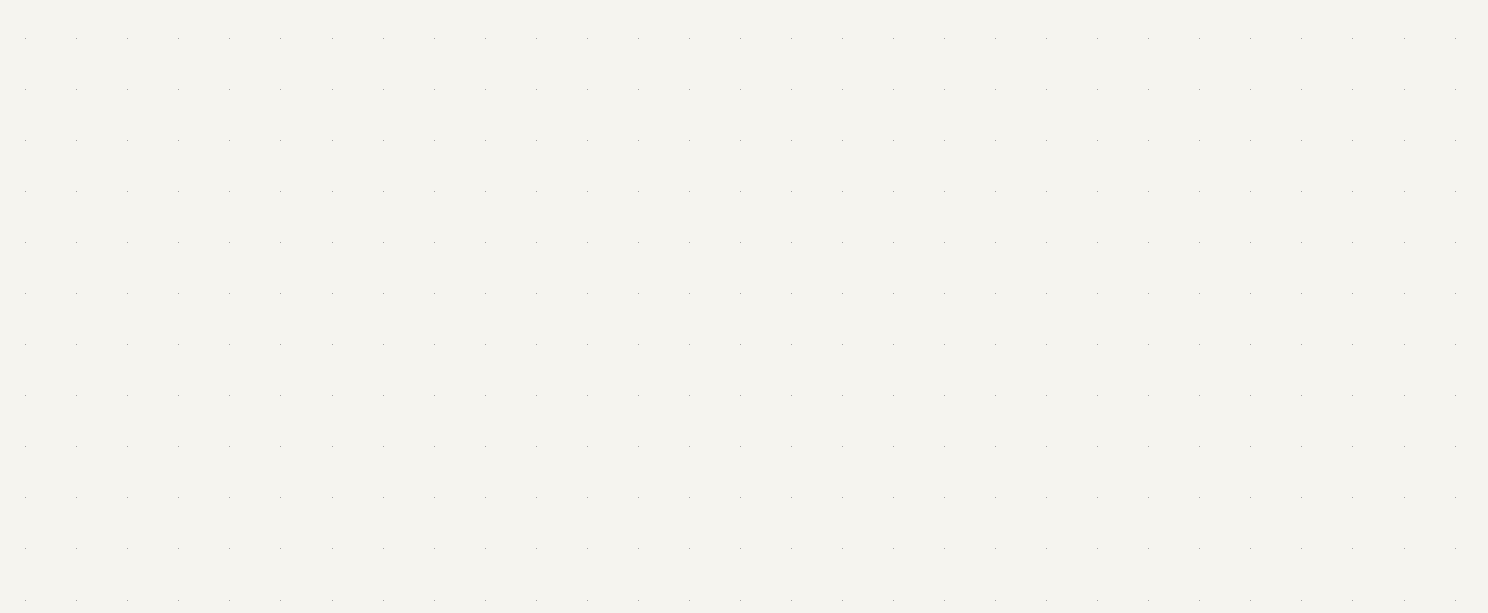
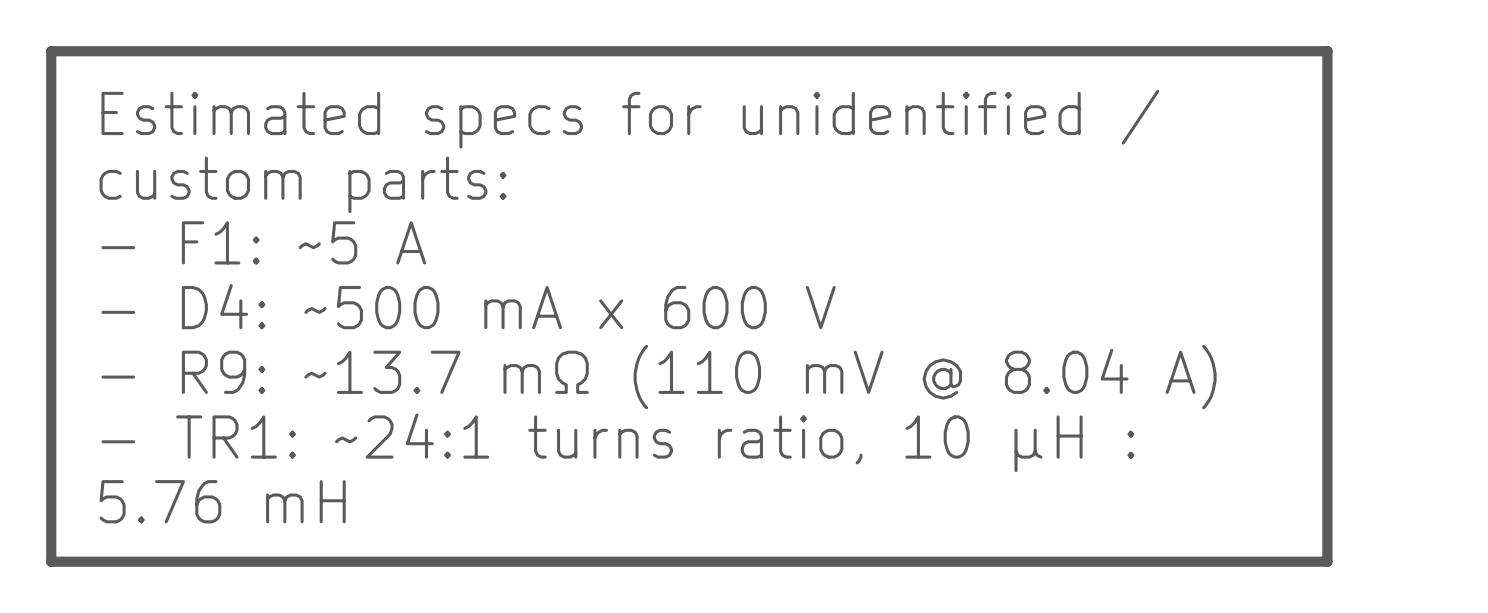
line: none -> (51, 51) (1327, 51) (1327, 561) (51, 561) (51, 51)
text: none -> Estimated specs for unidentified / (630, 119)
text: none -> custom parts: (303, 184)
text: none -> - F1: ~5 A (263, 242)
text: none -> - D4: ~500 mA x 600 V (468, 306)
text: none -> - R9: ~13.7 mΩ (110 mV @ 8.04 A) (659, 377)
text: none -> - TR1: ~24:1 turns ratio, 10 μH : (617, 442)
text: none -> 5.76 mH (222, 501)

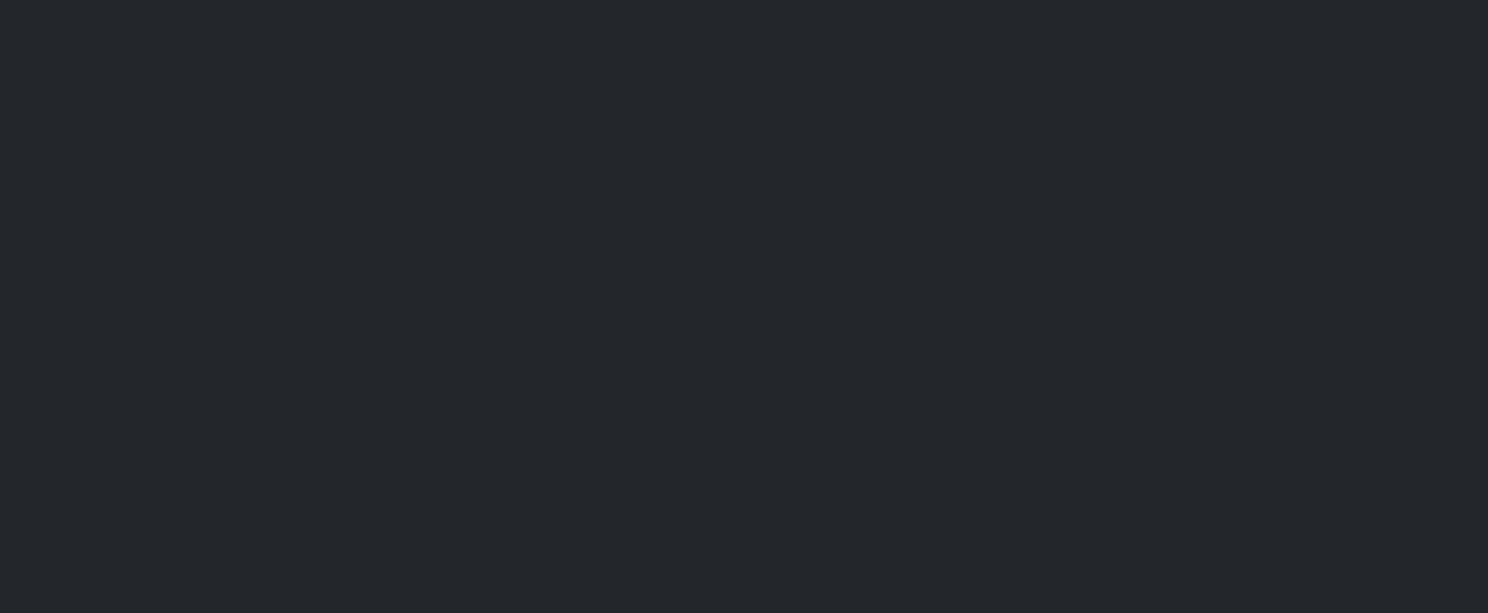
line: (51, 51) (1327, 51) (1327, 561) (51, 561) (51, 51) -> none
text: Estimated specs for unidentified / (630, 119) -> none
text: custom parts: (303, 184) -> none
text: - F1: ~5 A (263, 242) -> none
text: - D4: ~500 mA x 600 V (468, 306) -> none
text: - R9: ~13.7 mΩ (110 mV @ 8.04 A) (659, 377) -> none
text: - TR1: ~24:1 turns ratio, 10 μH : (617, 442) -> none
text: 5.76 mH (222, 501) -> none

